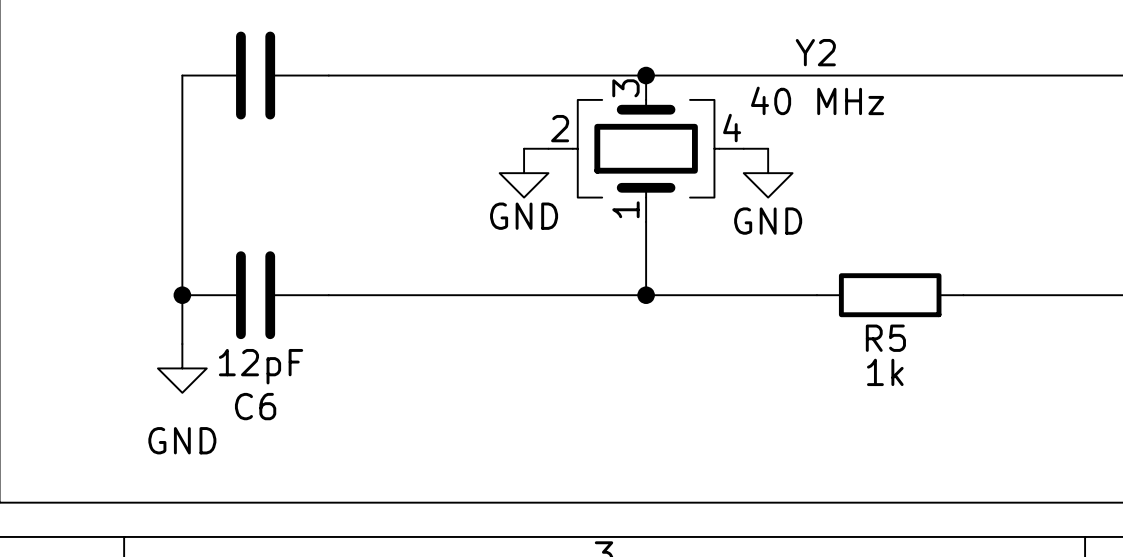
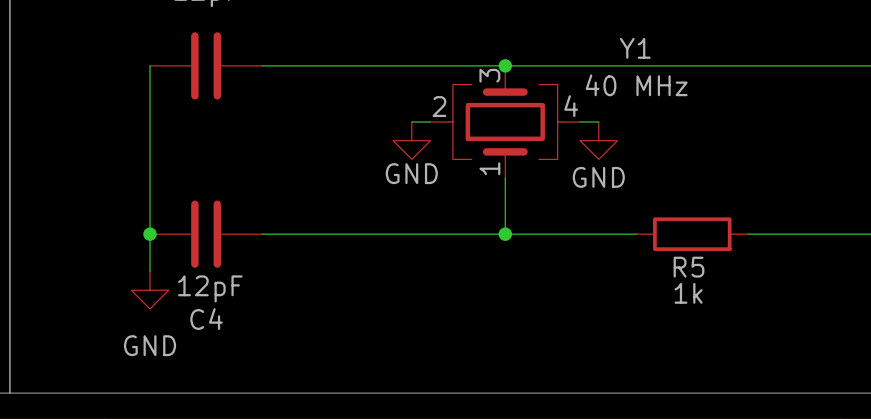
Y2 name: Y2 (815, 52) -> Y1 (635, 48)
C6 name: C6 (255, 406) -> C4 (206, 319)

